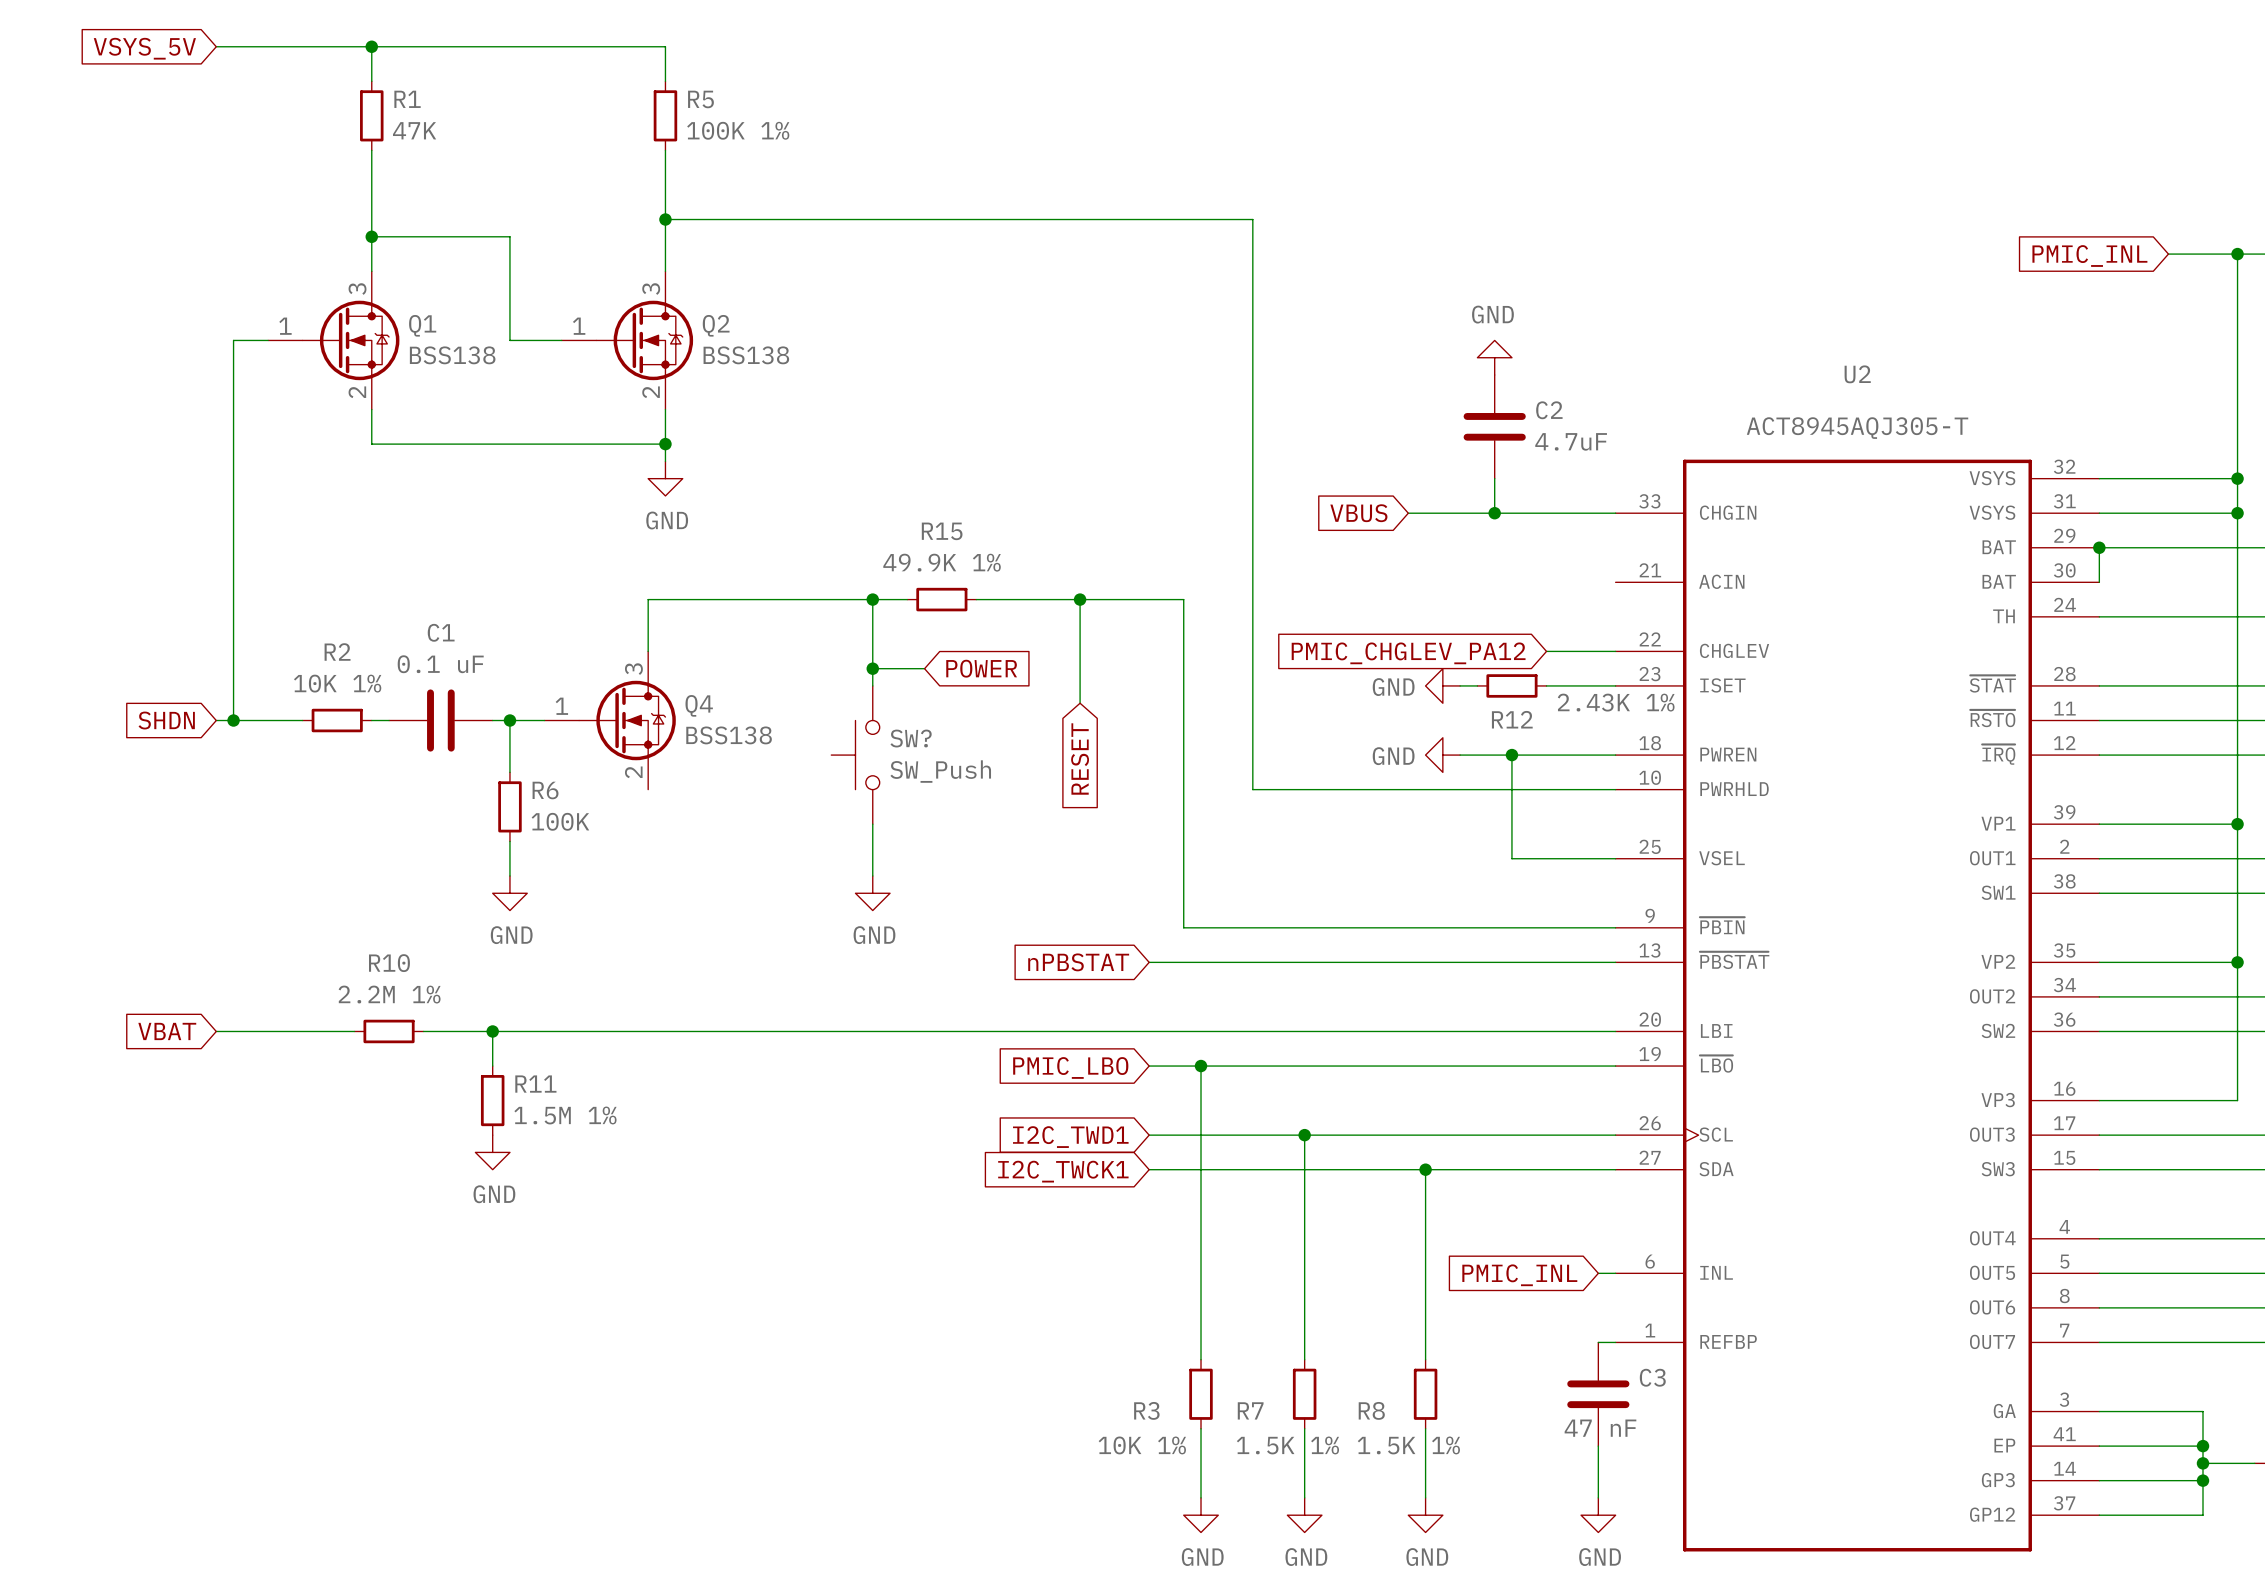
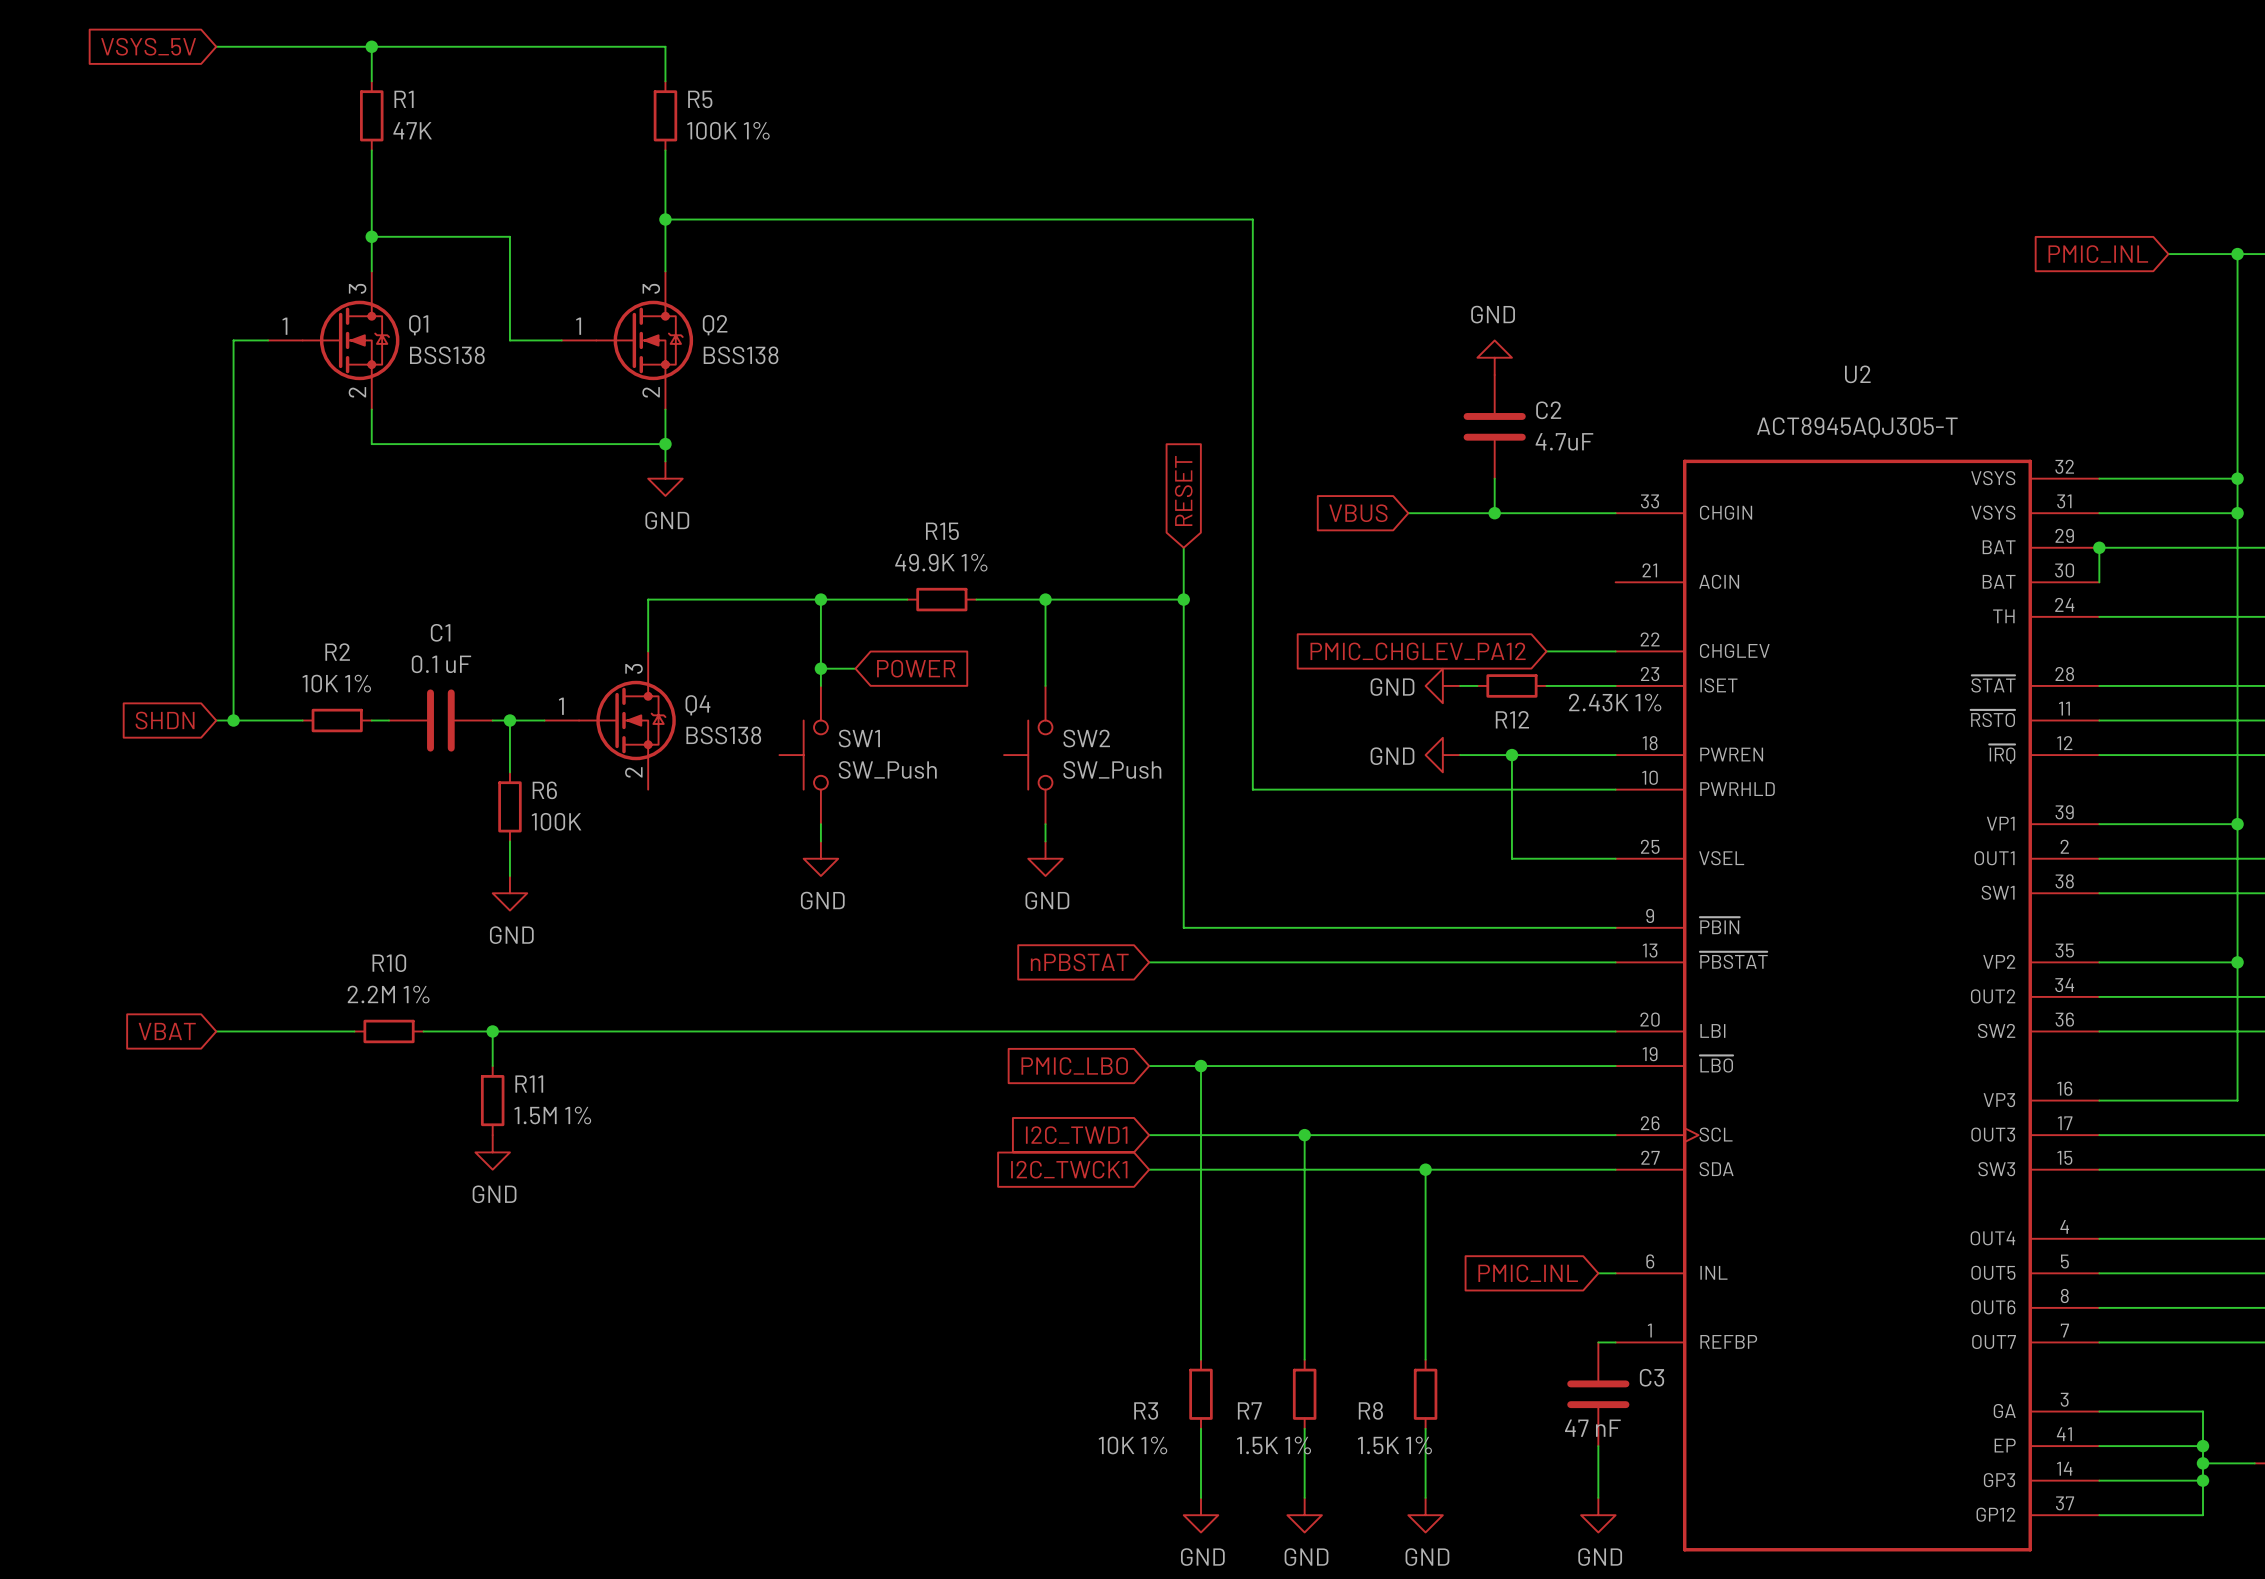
wire: none -> (1183, 547) (1183, 599)
junction: none -> (820, 599)
wire: (872, 599) (872, 685) -> (820, 599) (820, 685)
junction: (872, 599) -> none
wire: none -> (1045, 599) (1045, 685)
wire: (1080, 599) (1080, 703) -> none
junction position: (1080, 599) -> (1045, 599)
junction: none -> (1183, 599)
wire: none -> (820, 668) (855, 668)
junction: none -> (820, 668)
wire: (872, 668) (924, 668) -> none
junction: (872, 668) -> none
global label position: POWER (981, 668) -> POWER (916, 668)
SW1: none -> SW_Push (803, 755)
SW?: SW_Push (855, 755) -> none
SW2: none -> SW_Push (1028, 755)
global label rotation: 0° (1080, 759) -> 180° (1183, 490)
global label position: RESET (1080, 759) -> RESET (1183, 490)
wire: none -> (820, 824) (820, 841)
wire: (872, 824) (872, 876) -> none
wire: none -> (1045, 824) (1045, 841)
power symbol: none -> GND (1045, 858)
power symbol position: GND (872, 893) -> GND (820, 858)

